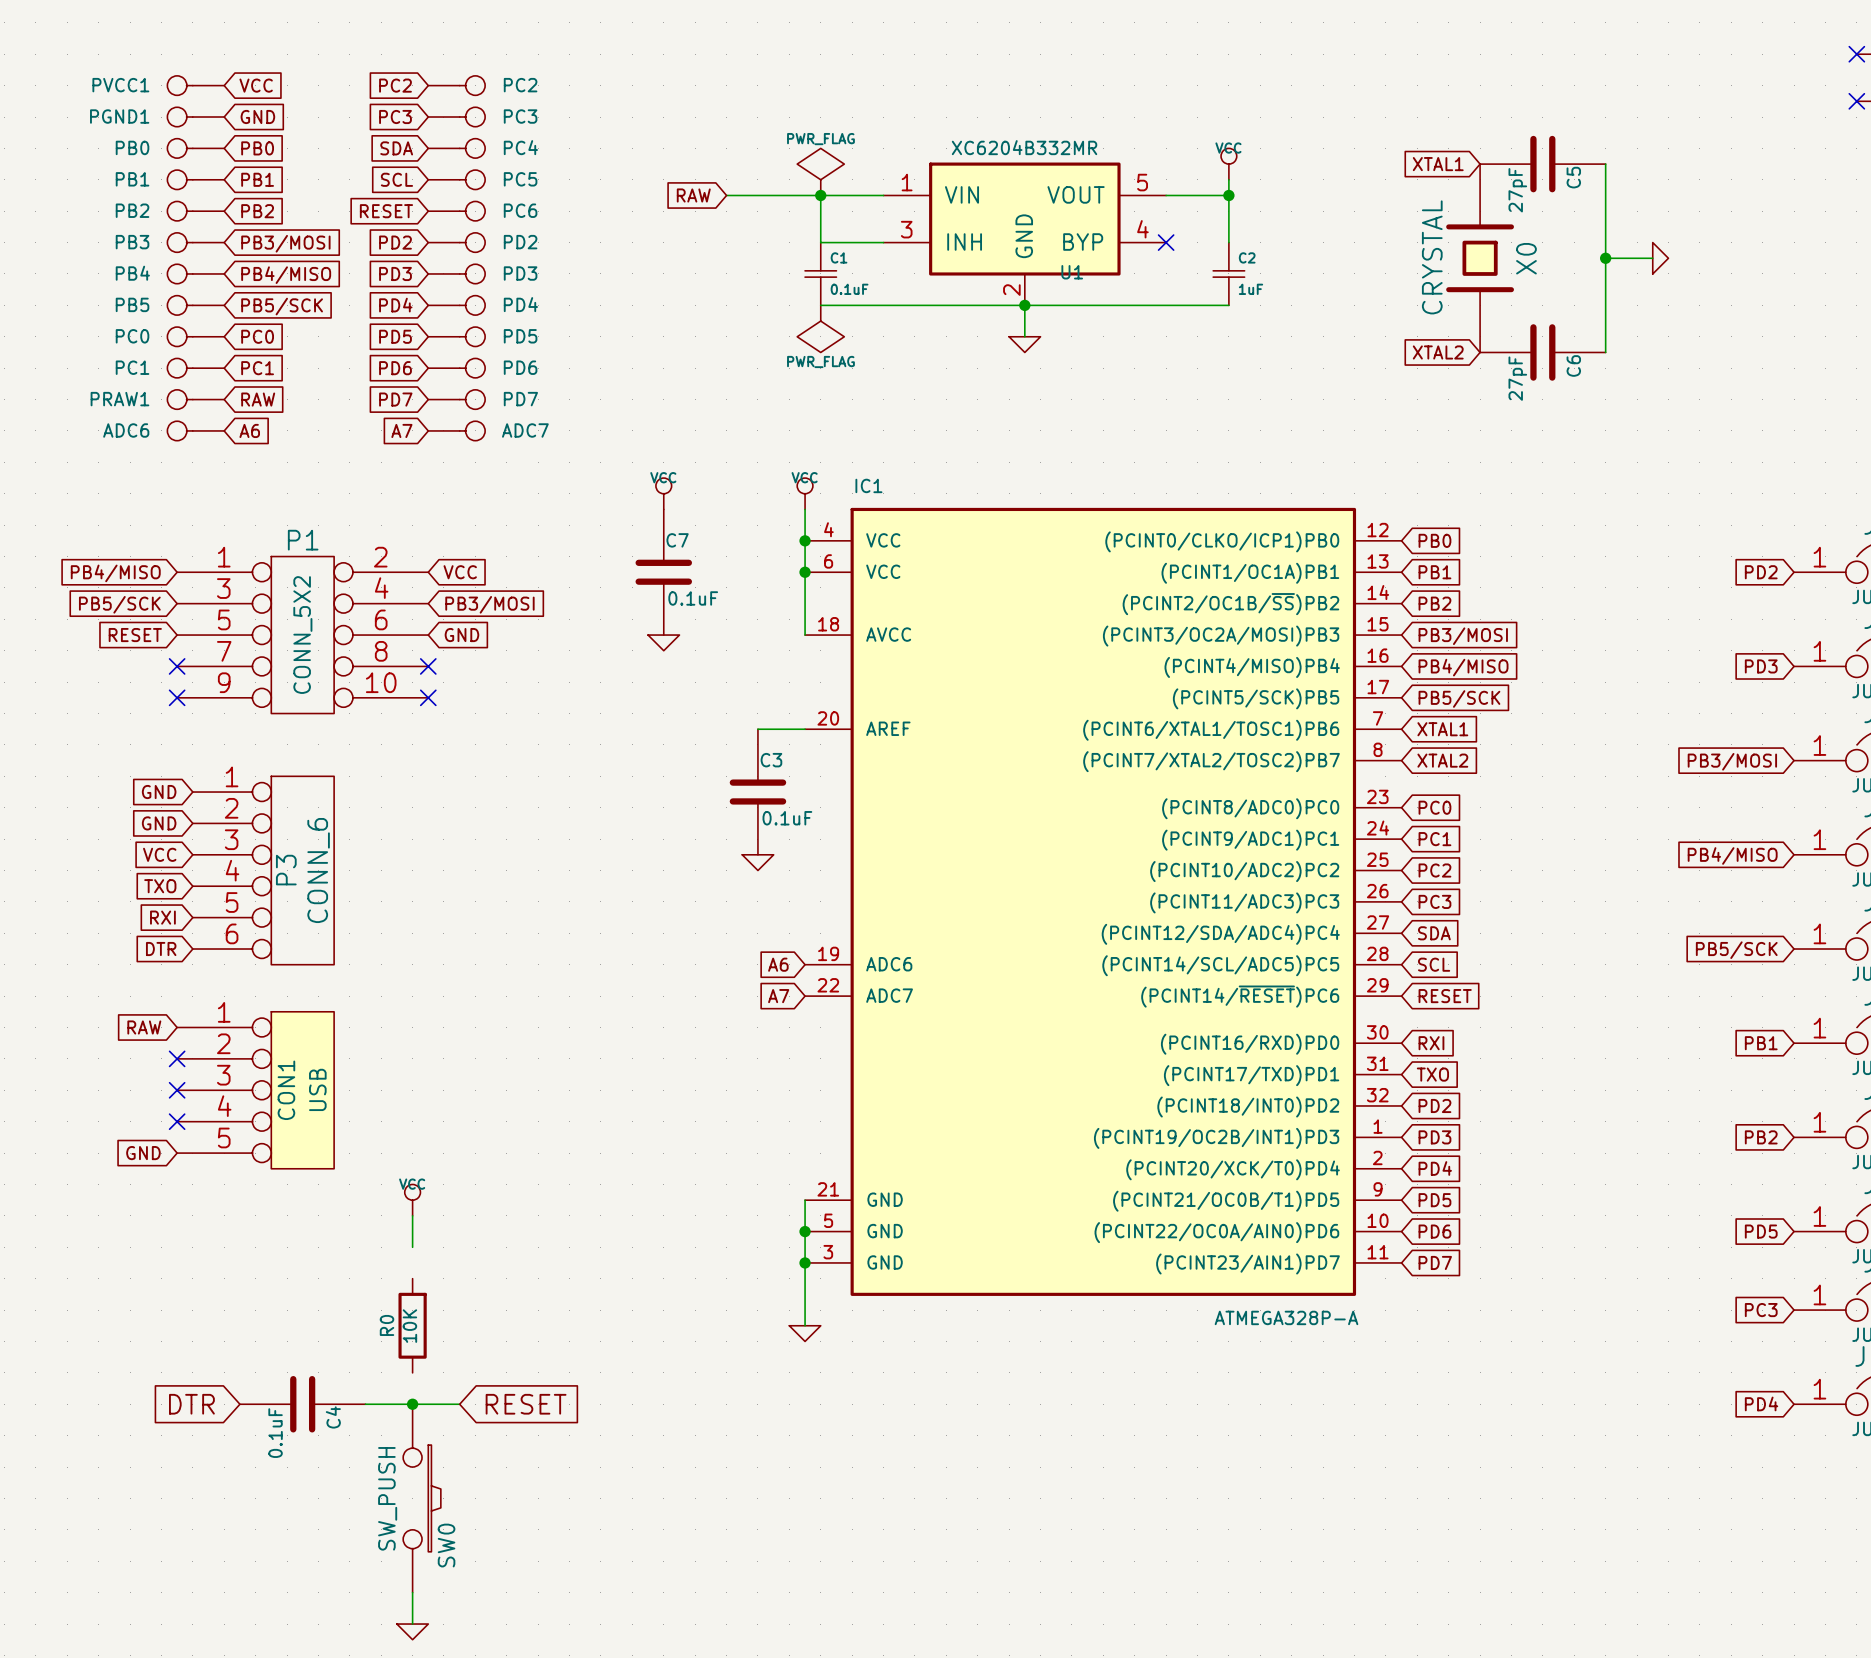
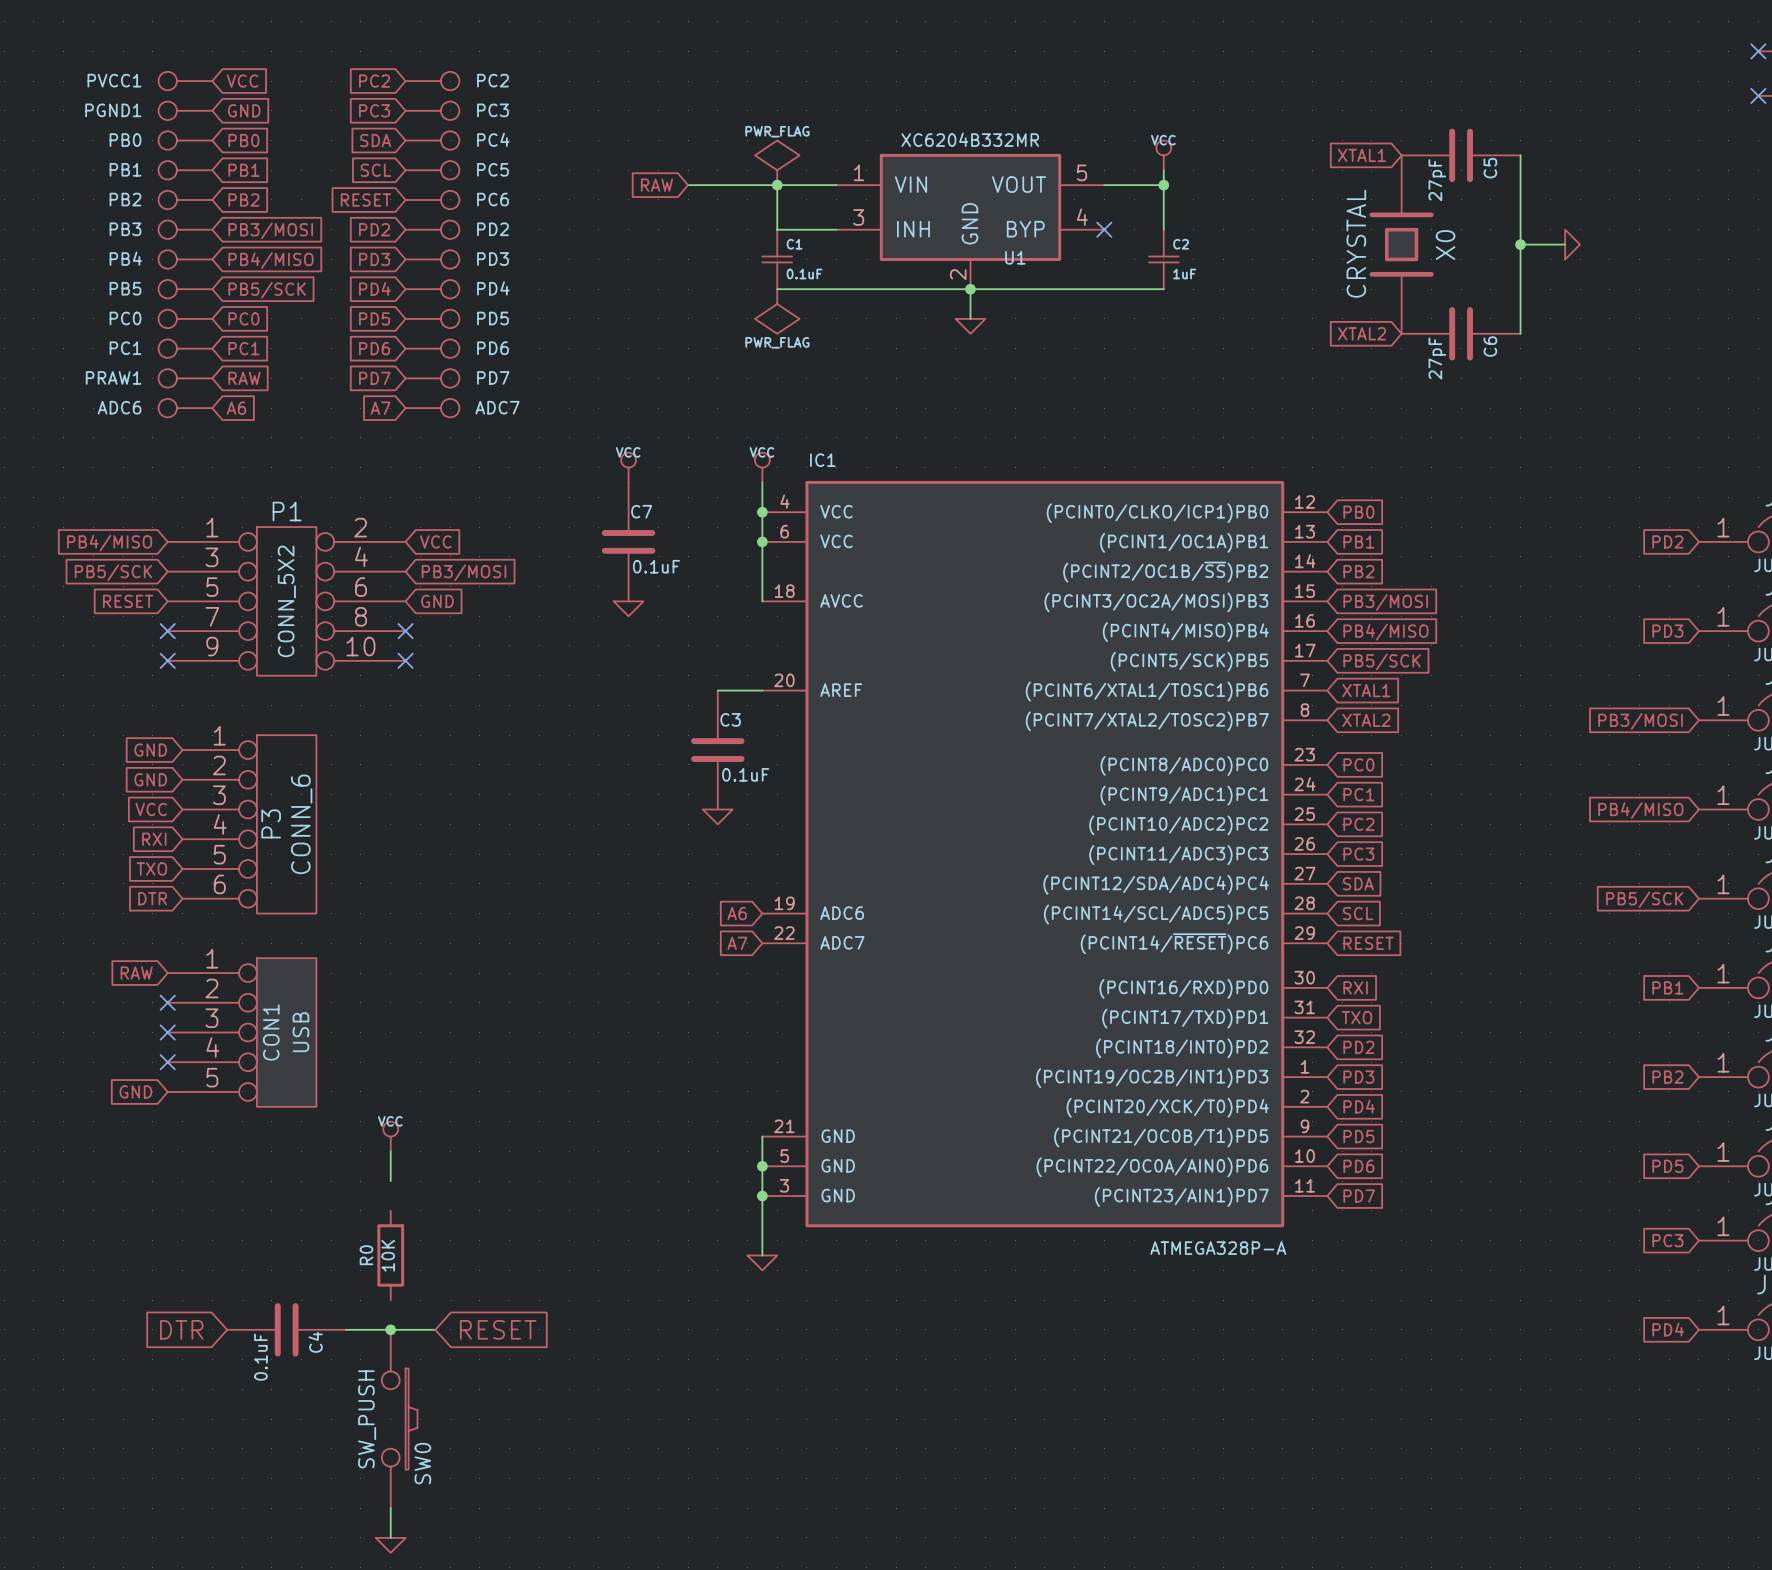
global label: TXO (160, 886) -> RXI (154, 839)
global label: RXI (162, 917) -> TXO (151, 868)

